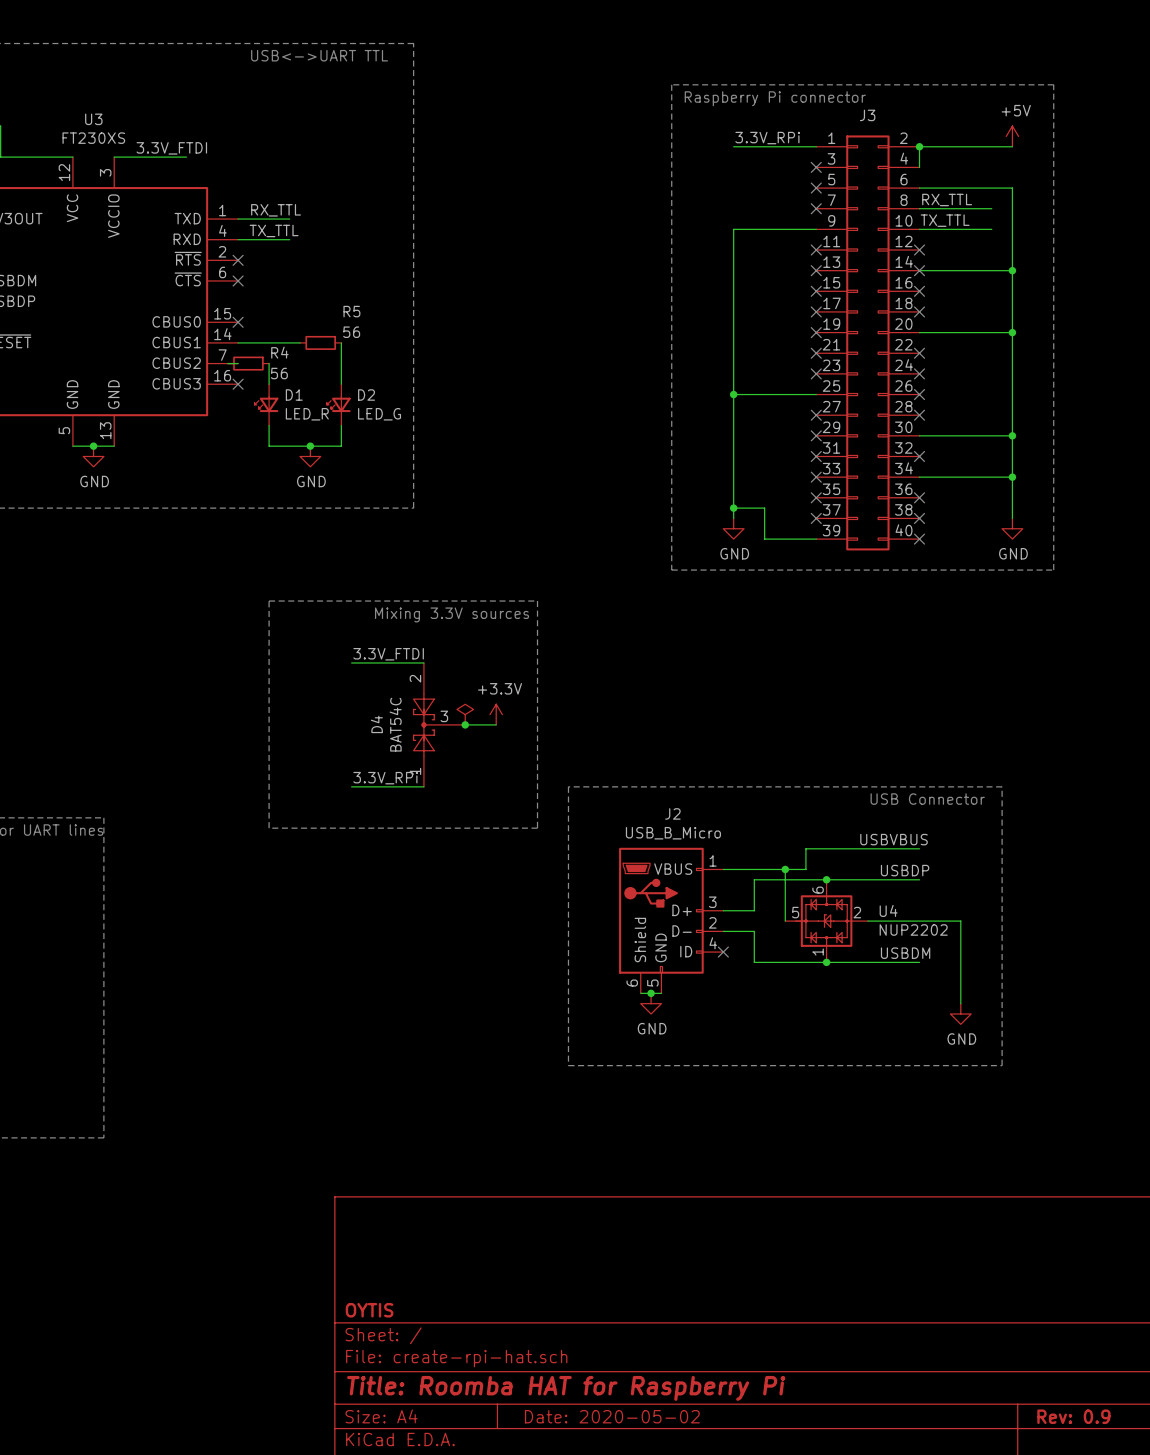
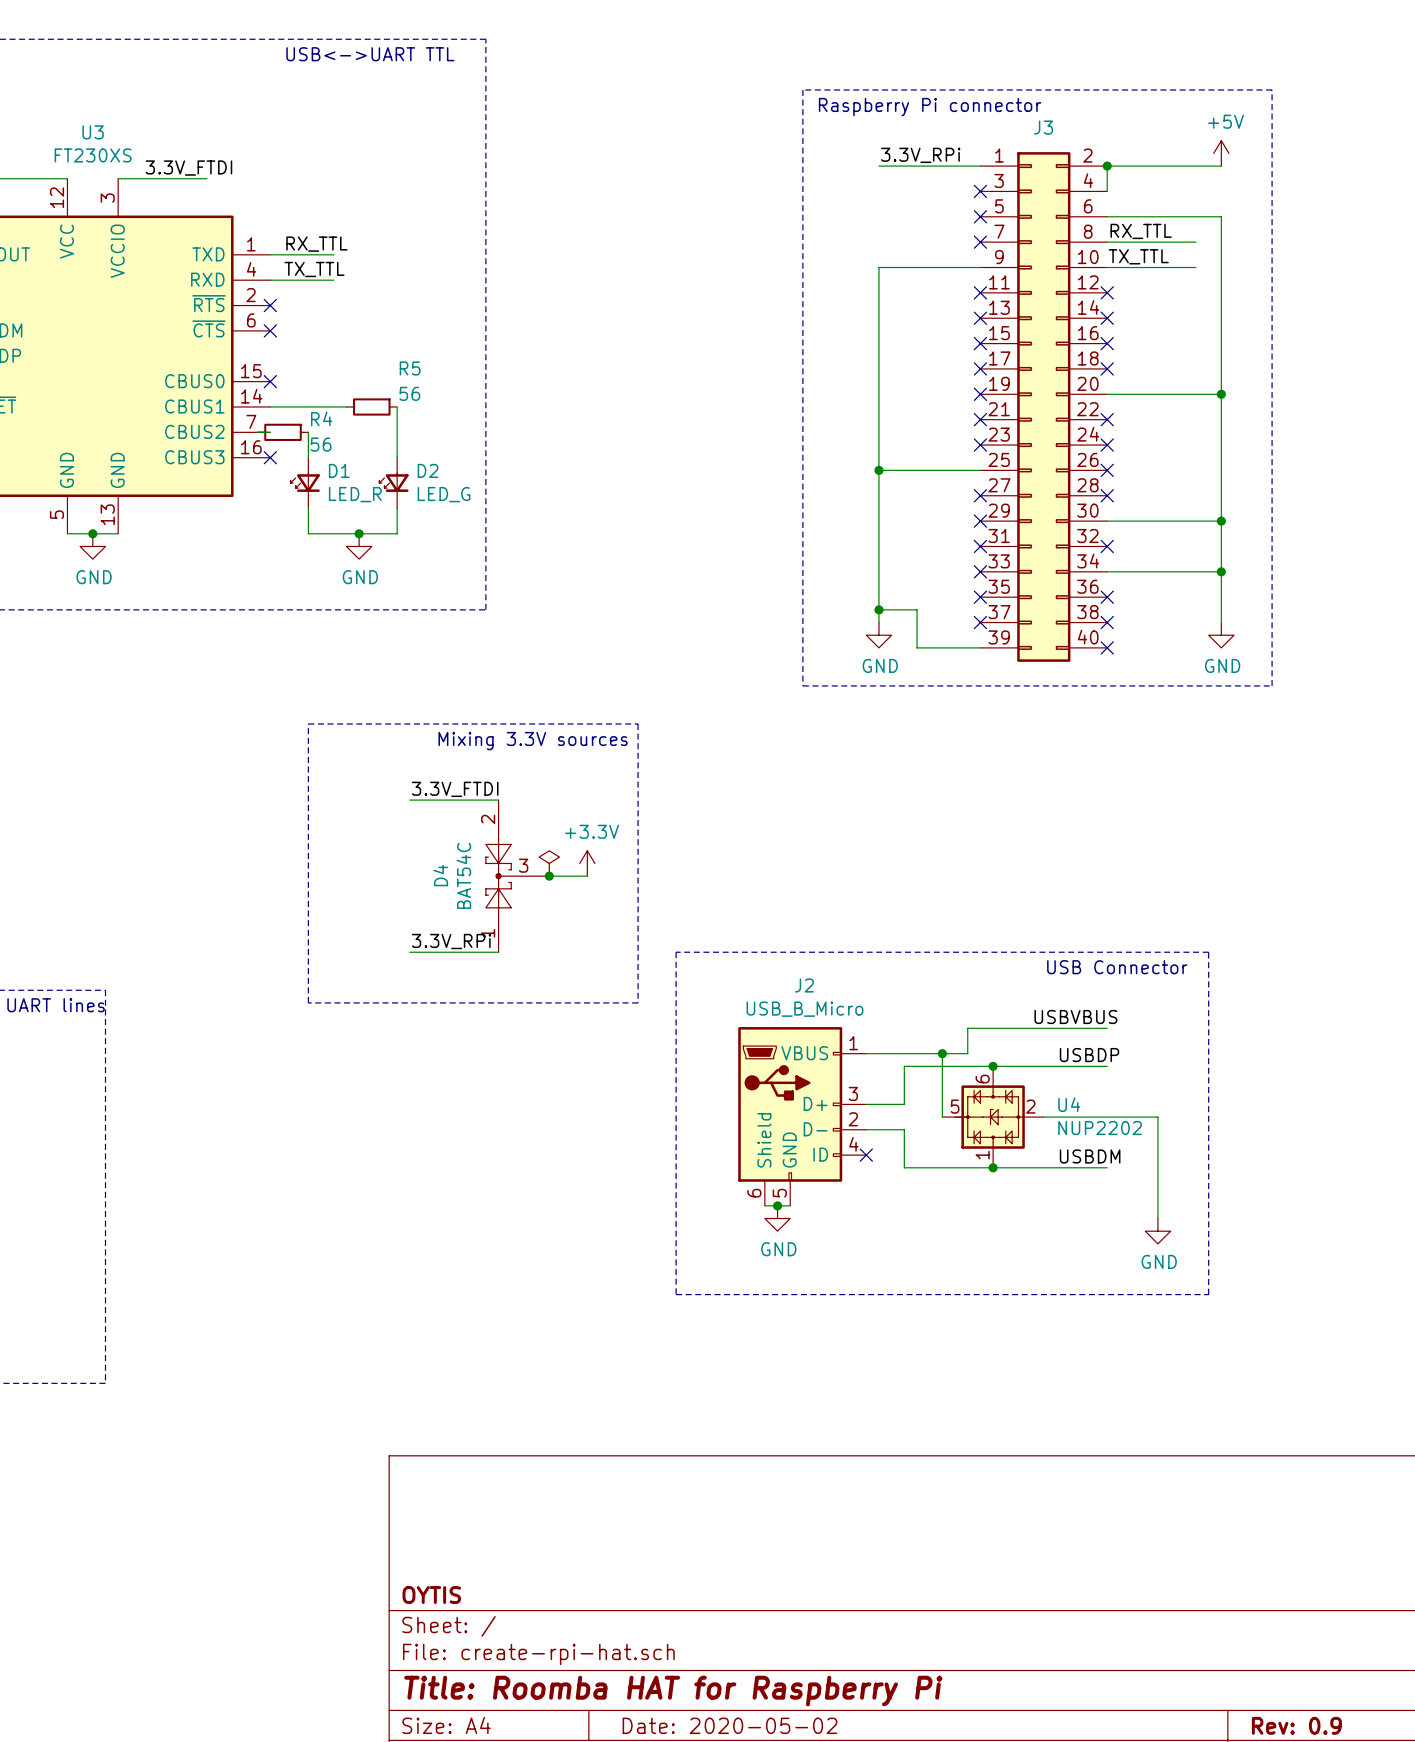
wire: (919, 270) (1012, 270) -> none
junction: (1012, 270) -> none

